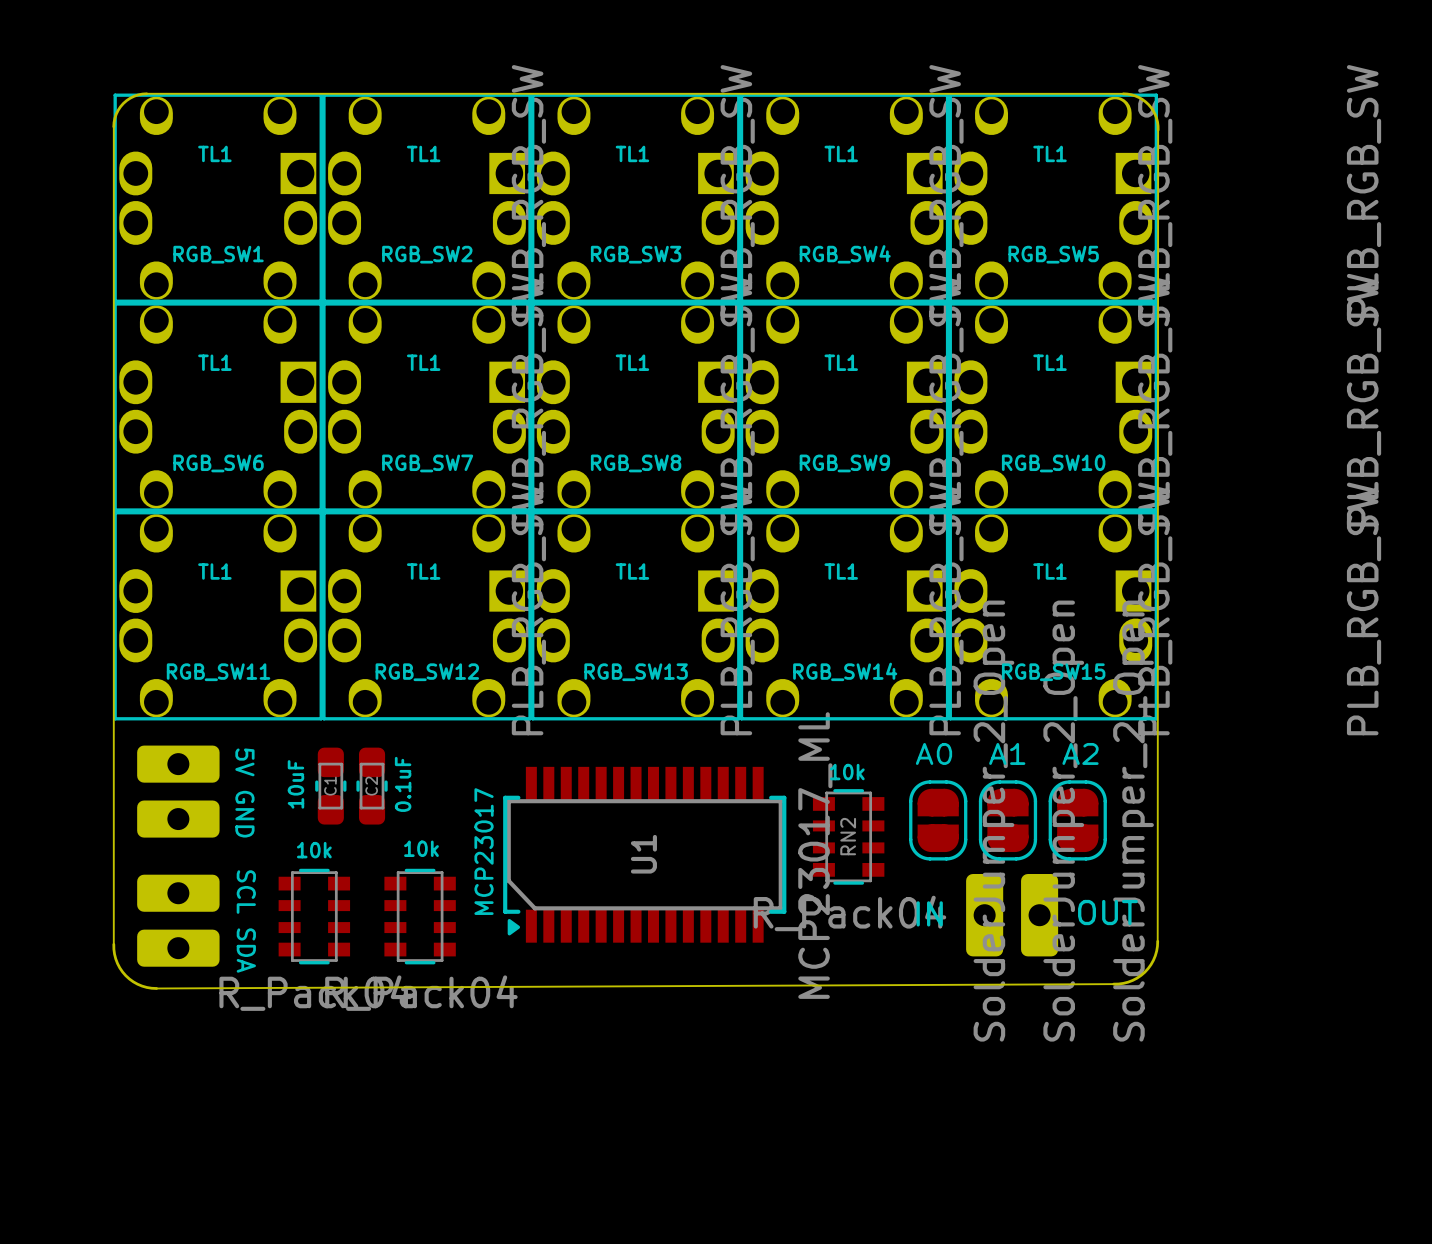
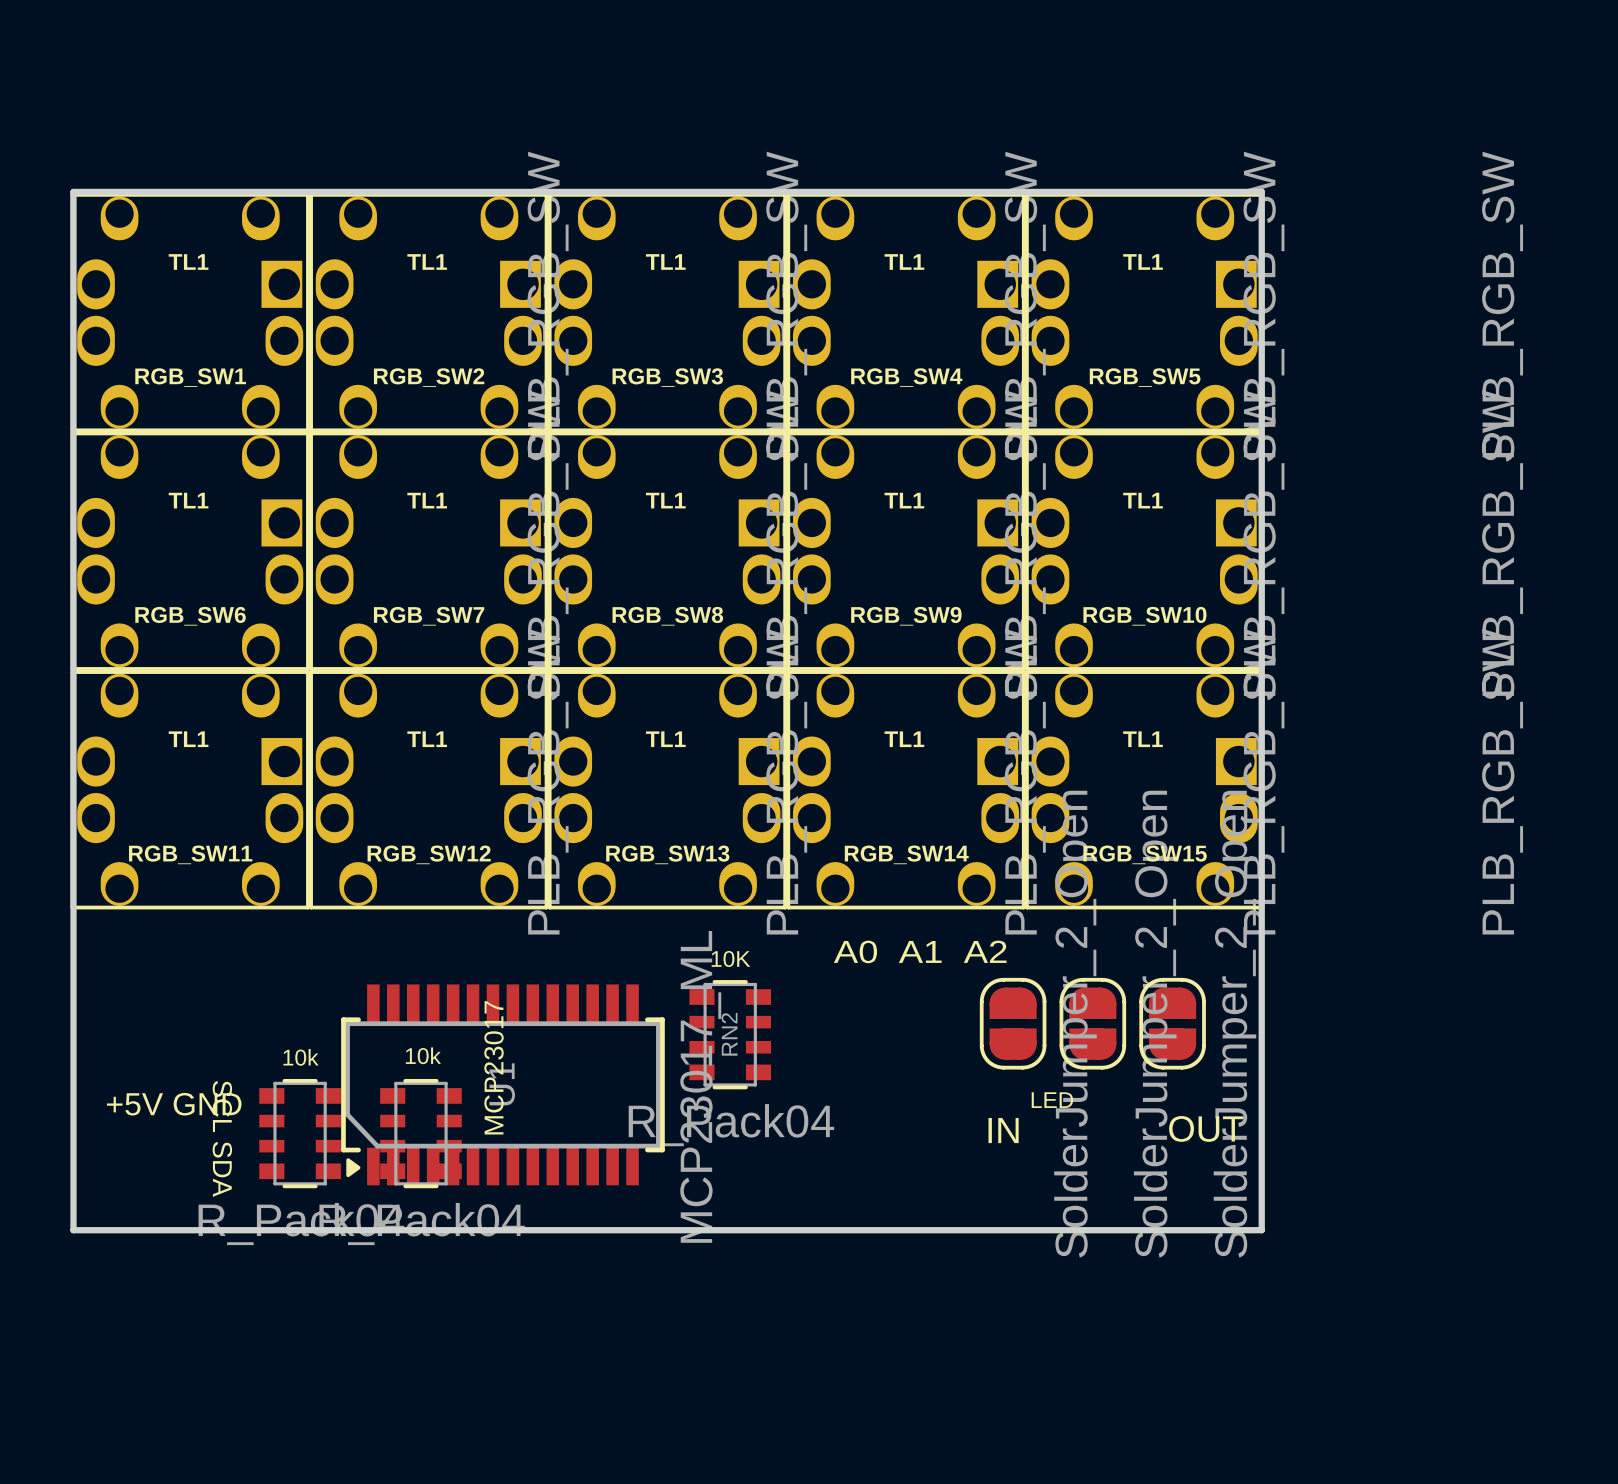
board edge: (146, 93) (1123, 93) (1135, 95) (1145, 101) (1155, 114) (1158, 130) (1157, 941) (1155, 955) (1148, 968) (1132, 980) (1113, 984) (156, 988) (142, 986) (129, 978) (117, 963) (113, 949) (113, 126) (116, 114) (123, 103) (134, 96) (146, 93) -> (73, 191) (73, 1230) (1261, 1230) (1261, 191) (73, 191)
text position: A0 A1 A2 (1007, 753) -> A0 A1 A2 (920, 951)
text: none -> 10K (730, 958)
text: 10k (847, 772) -> none
C1: 10uF (330, 786) -> none
C2: 0.1uF (372, 786) -> none
part: (178, 791) -> none
text: 5V GND (244, 793) -> none
RN2 position: (848, 836) -> (730, 1034)
U1 position: (644, 854) -> (502, 1084)
text: none -> LED (1052, 1100)
text: none -> +5V GND (174, 1104)
part: (1012, 915) -> none
part: (178, 920) -> none

